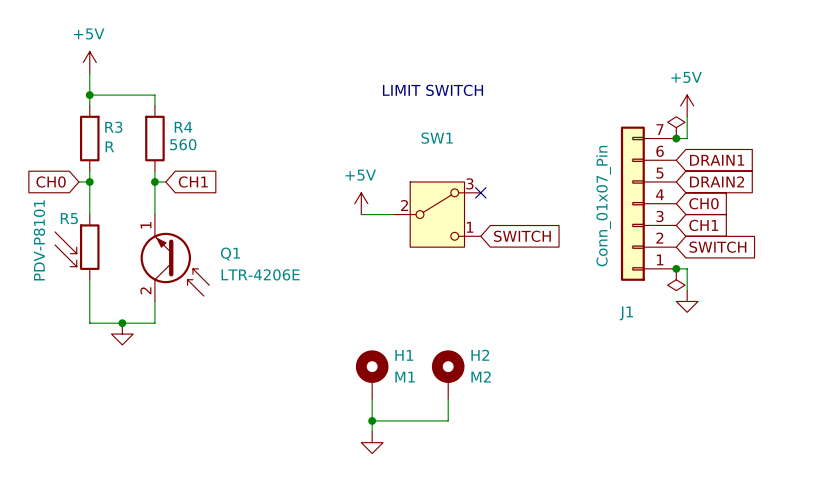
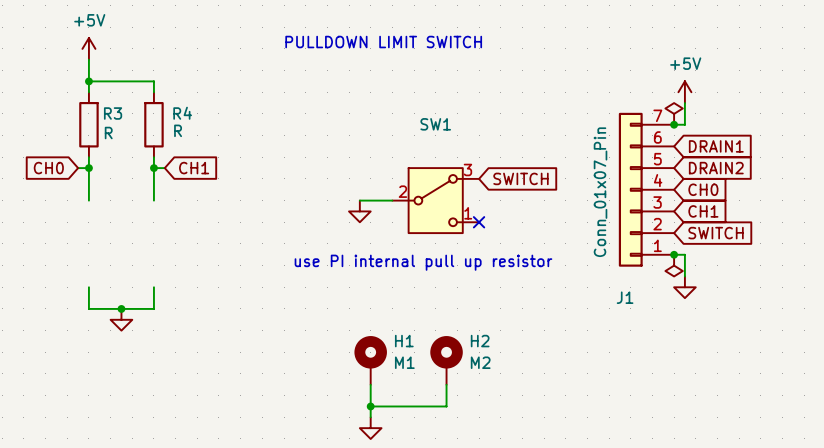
text: none -> PULLDOWN LIMIT SWITCH (383, 42)
text: LIMIT SWITCH (433, 90) -> none
R4 value: 560 (183, 144) -> R (178, 130)
no-connect mark position: (480, 192) -> (479, 222)
power symbol: +5V (361, 203) -> none
power symbol: none -> (359, 211)
global label position: SWITCH (522, 236) -> SWITCH (520, 178)
R5: PDV-P8101 (77, 247) -> none
Q1: LTR-4206E (174, 258) -> none
text: none -> use PI internal pull up resistor (423, 262)
wire: (89, 279) (89, 301) -> none

